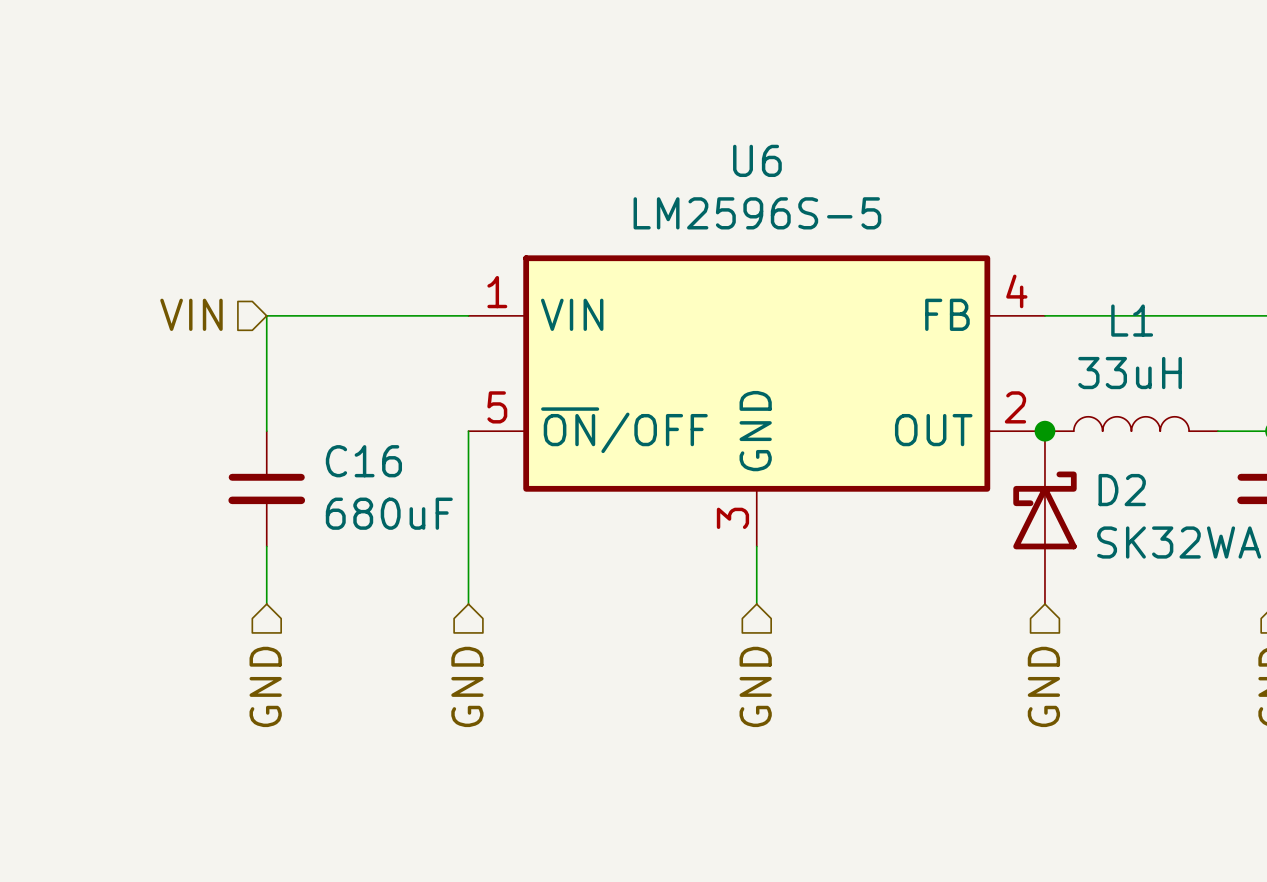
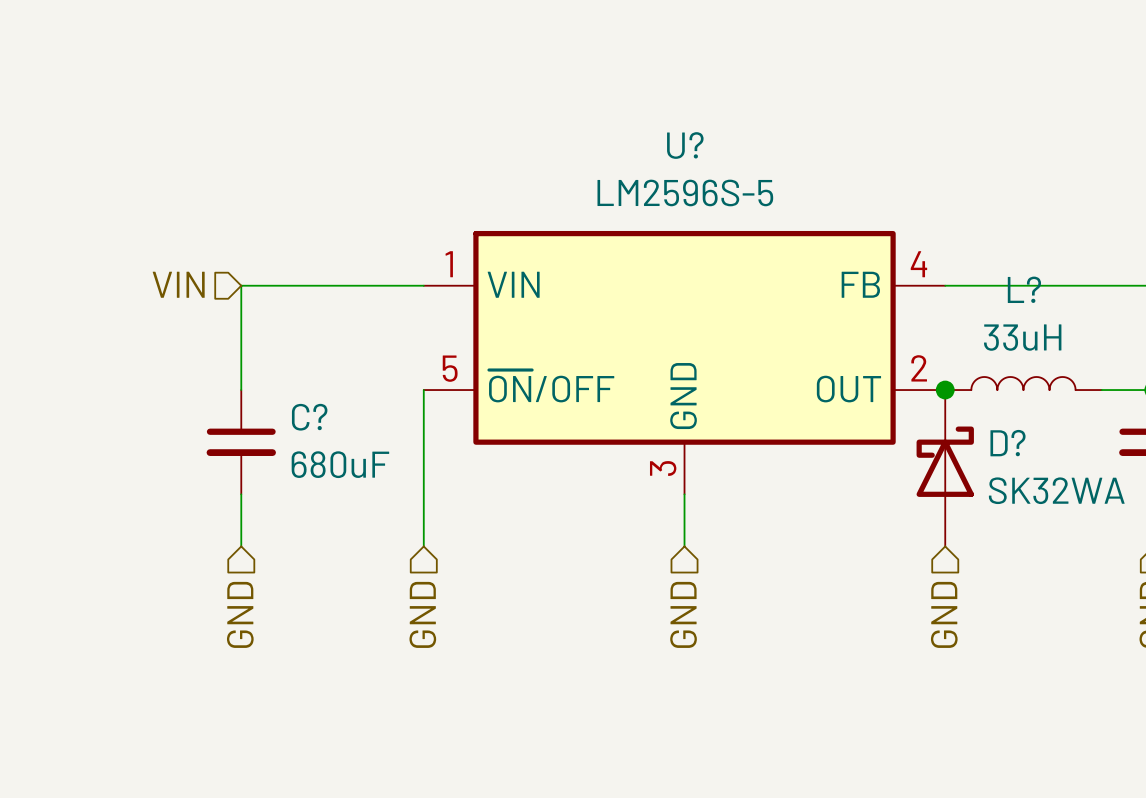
U6 name: U6 (757, 160) -> U? (685, 145)
L1 name: L1 (1132, 320) -> L? (1024, 289)
C16 name: C16 (363, 461) -> C? (309, 417)
D2 name: D2 (1122, 490) -> D? (1008, 443)

